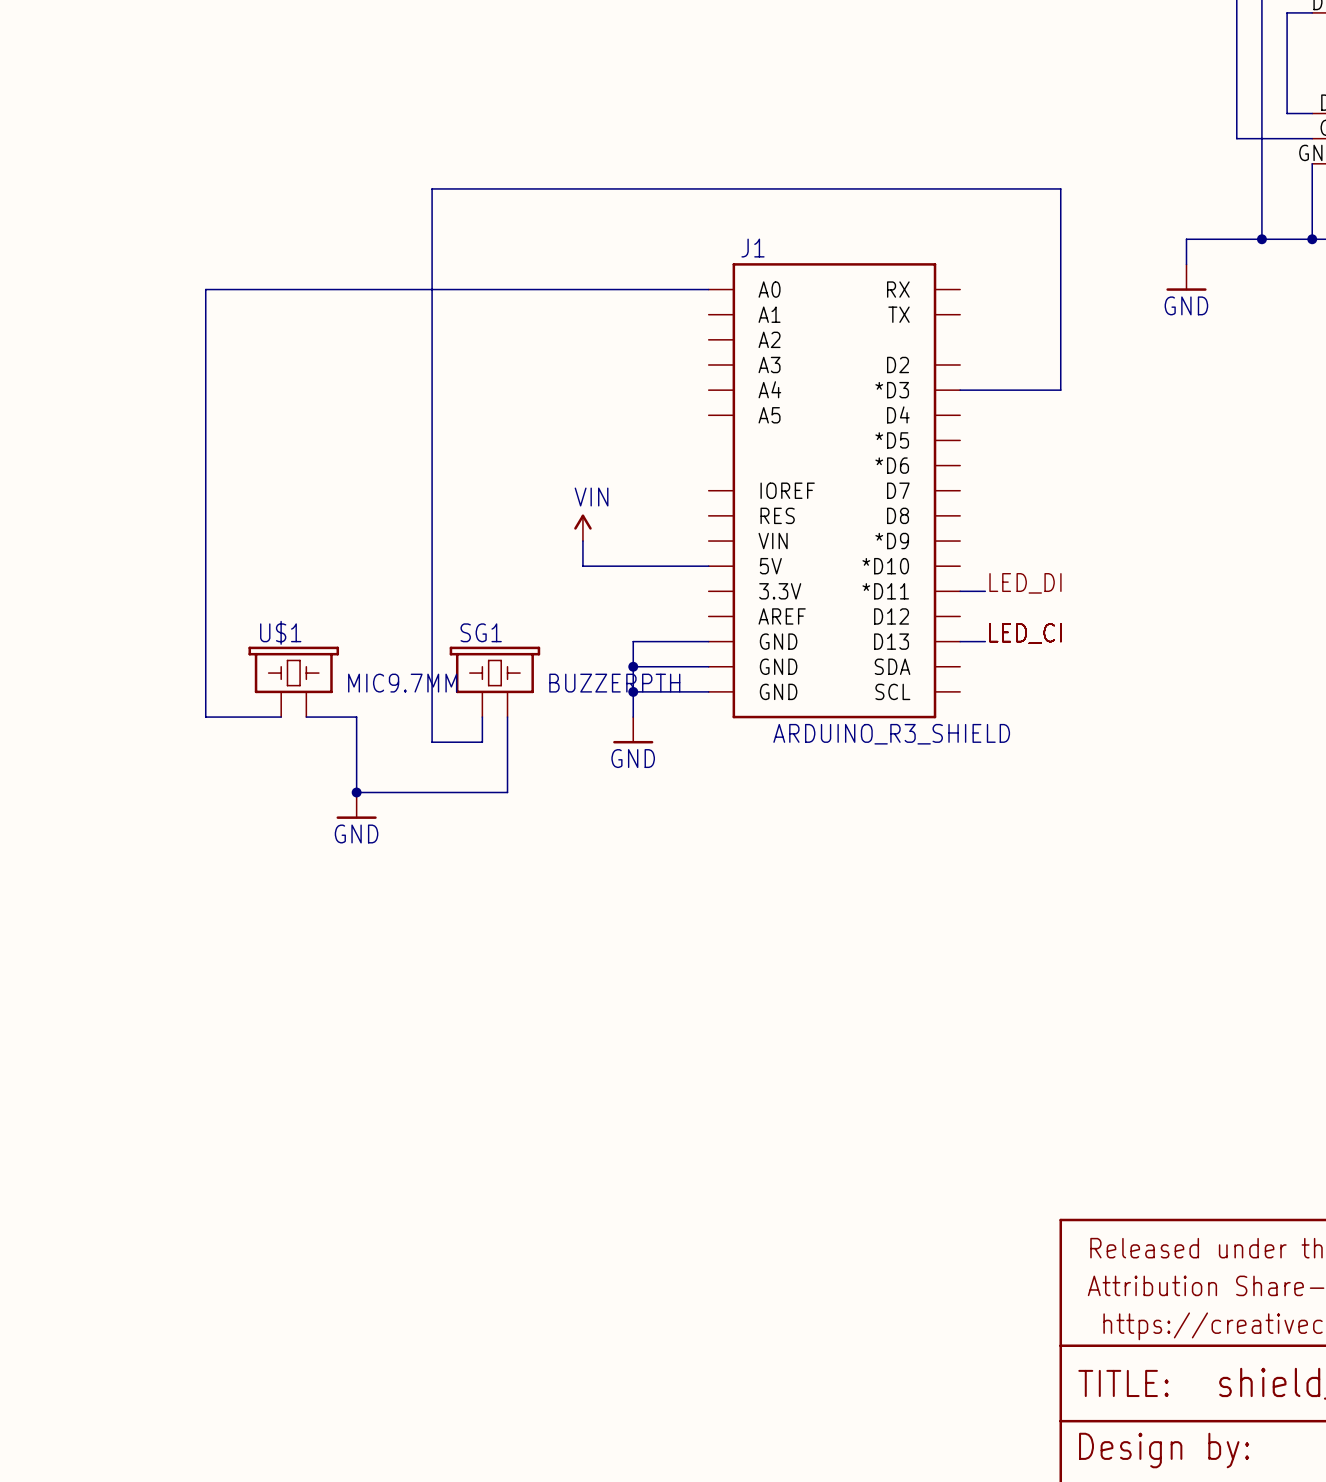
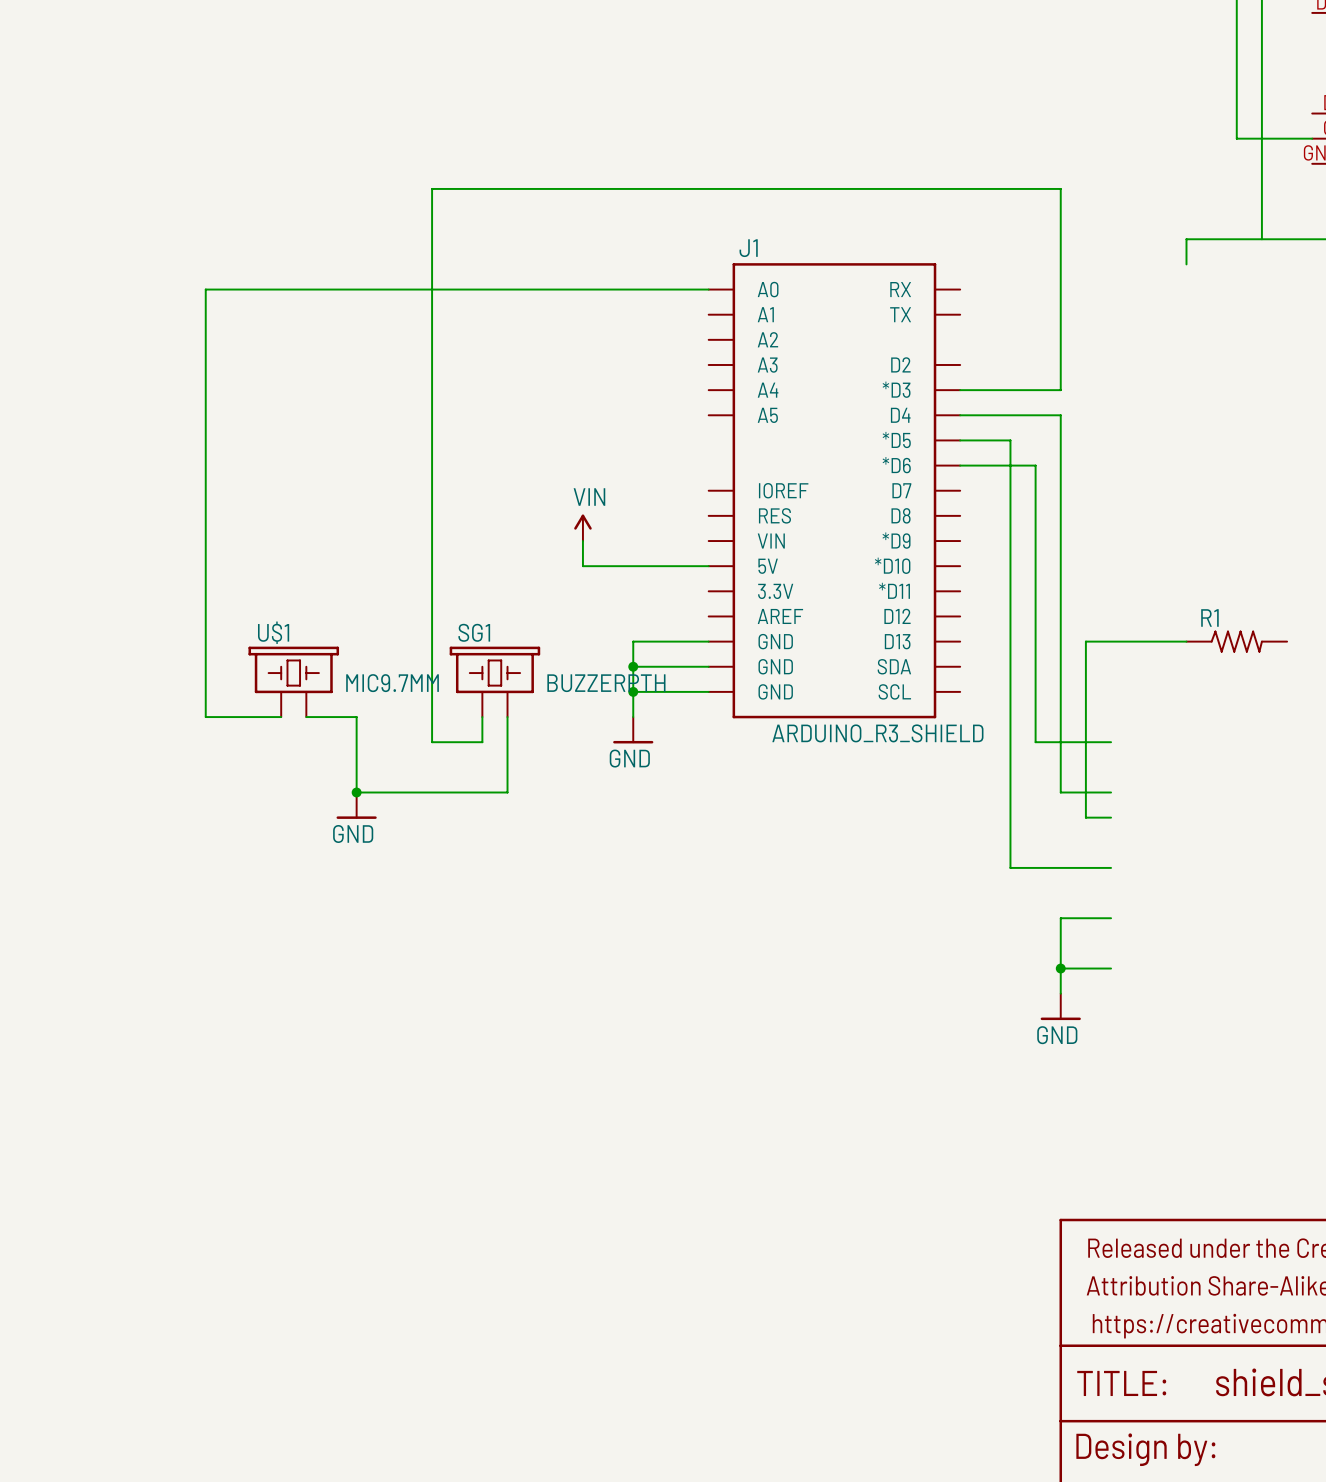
wire: (1312, 12) (1287, 12) (1287, 113) (1312, 113) -> none
wire: (1312, 163) (1312, 239) -> none
junction: (1261, 239) -> none
junction: (1312, 239) -> none
power symbol: GND (1186, 277) -> none
wire: none -> (960, 415) (1060, 415) (1060, 792) (1111, 792)
wire: none -> (960, 440) (1010, 440) (1010, 867) (1111, 867)
wire: none -> (960, 465) (1035, 465) (1035, 742) (1111, 742)
label: LED_DI (1025, 583) -> none
wire: (960, 591) (985, 591) -> none
label: LED_CI (1025, 633) -> none
wire: (960, 641) (985, 641) -> none
wire: none -> (1186, 641) (1085, 641) (1085, 817) (1111, 817)
R1: none -> (1236, 641)
wire: none -> (1111, 918) (1060, 918) (1060, 993)
wire: none -> (1060, 968) (1111, 968)
junction: none -> (1060, 968)
power symbol: none -> GND (1060, 1006)

